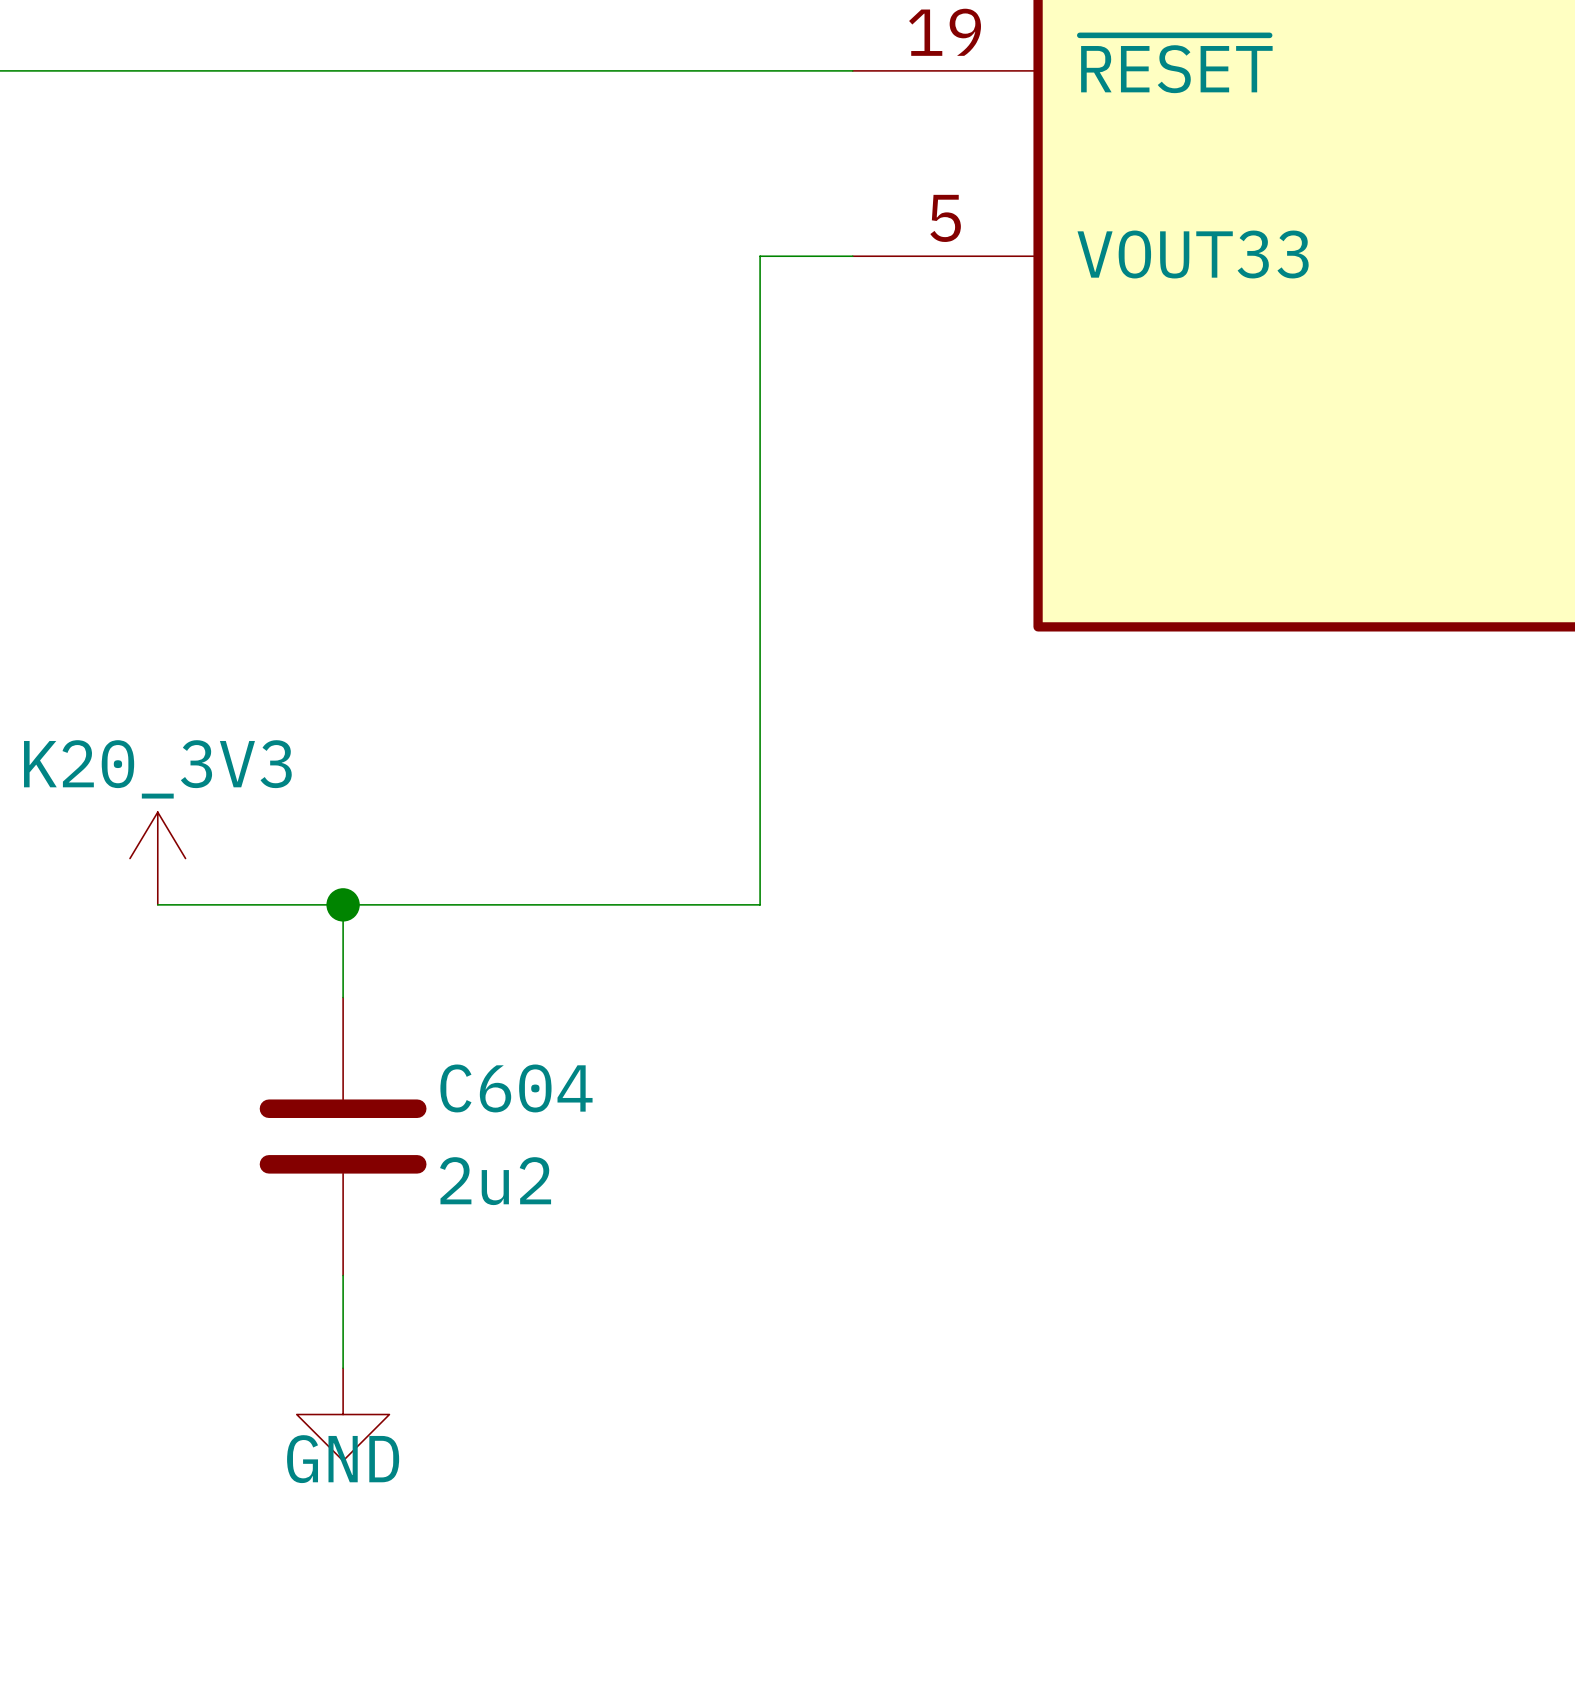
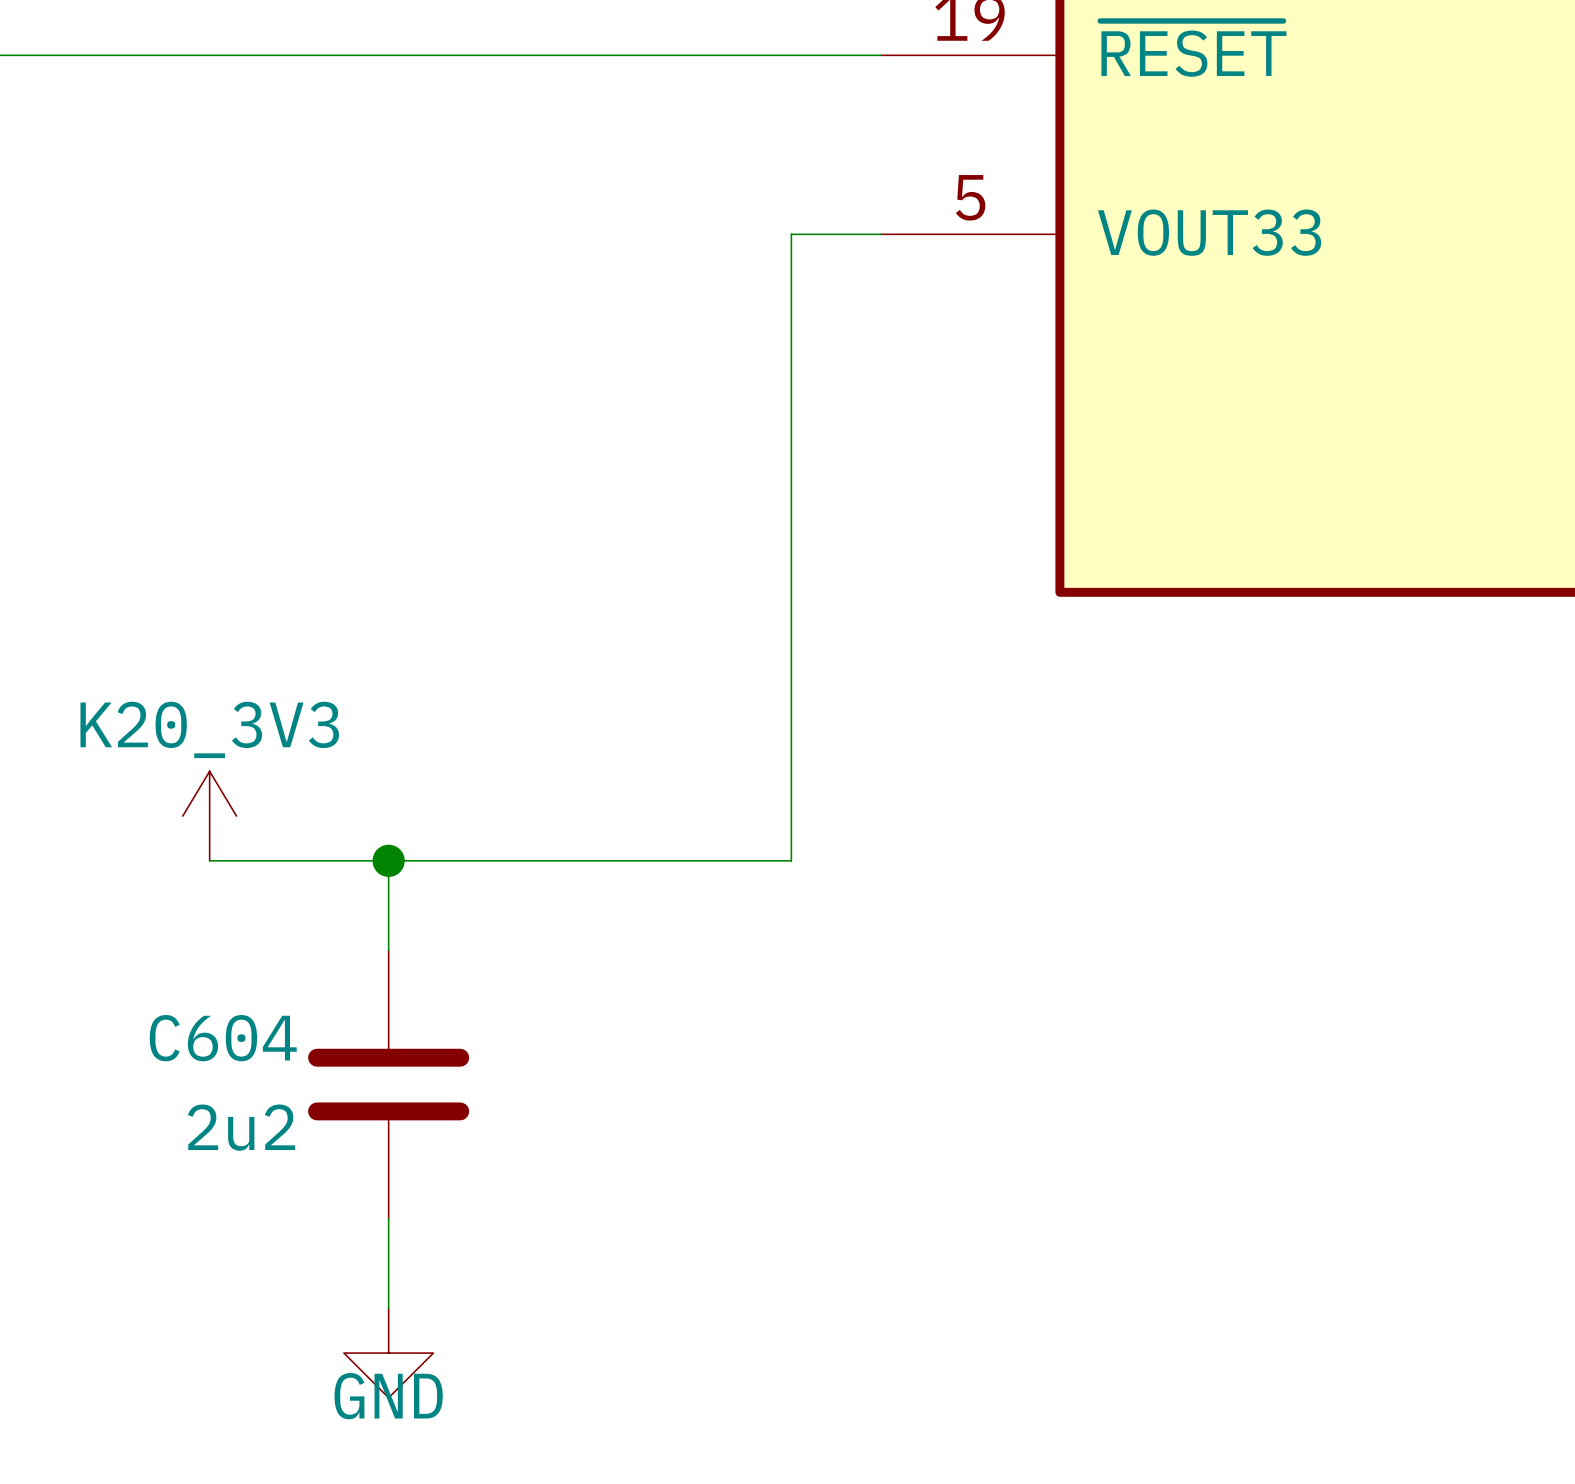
C604 name position: C604 (516, 1088) -> C604 (223, 1038)
C604 value position: 2u2 (495, 1181) -> 2u2 (241, 1127)

